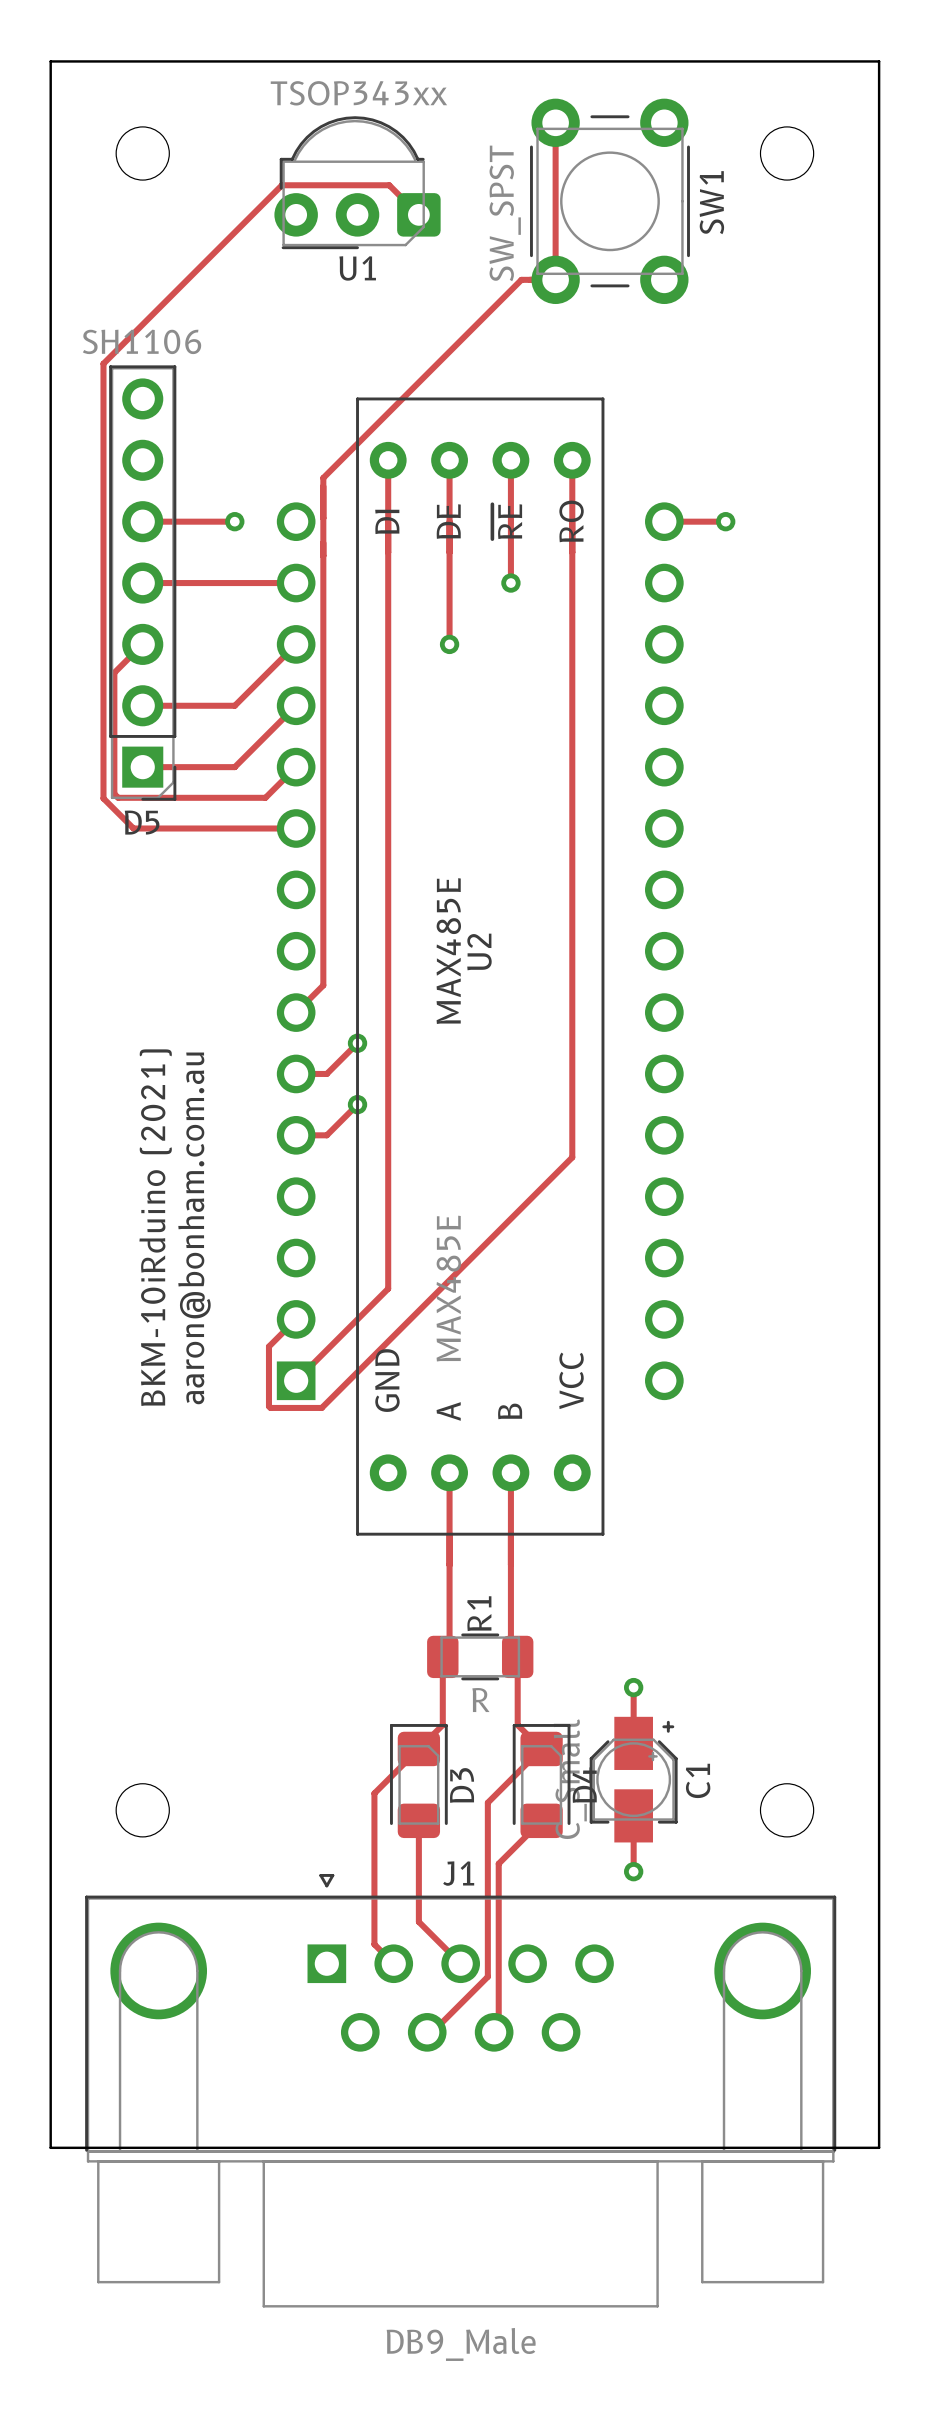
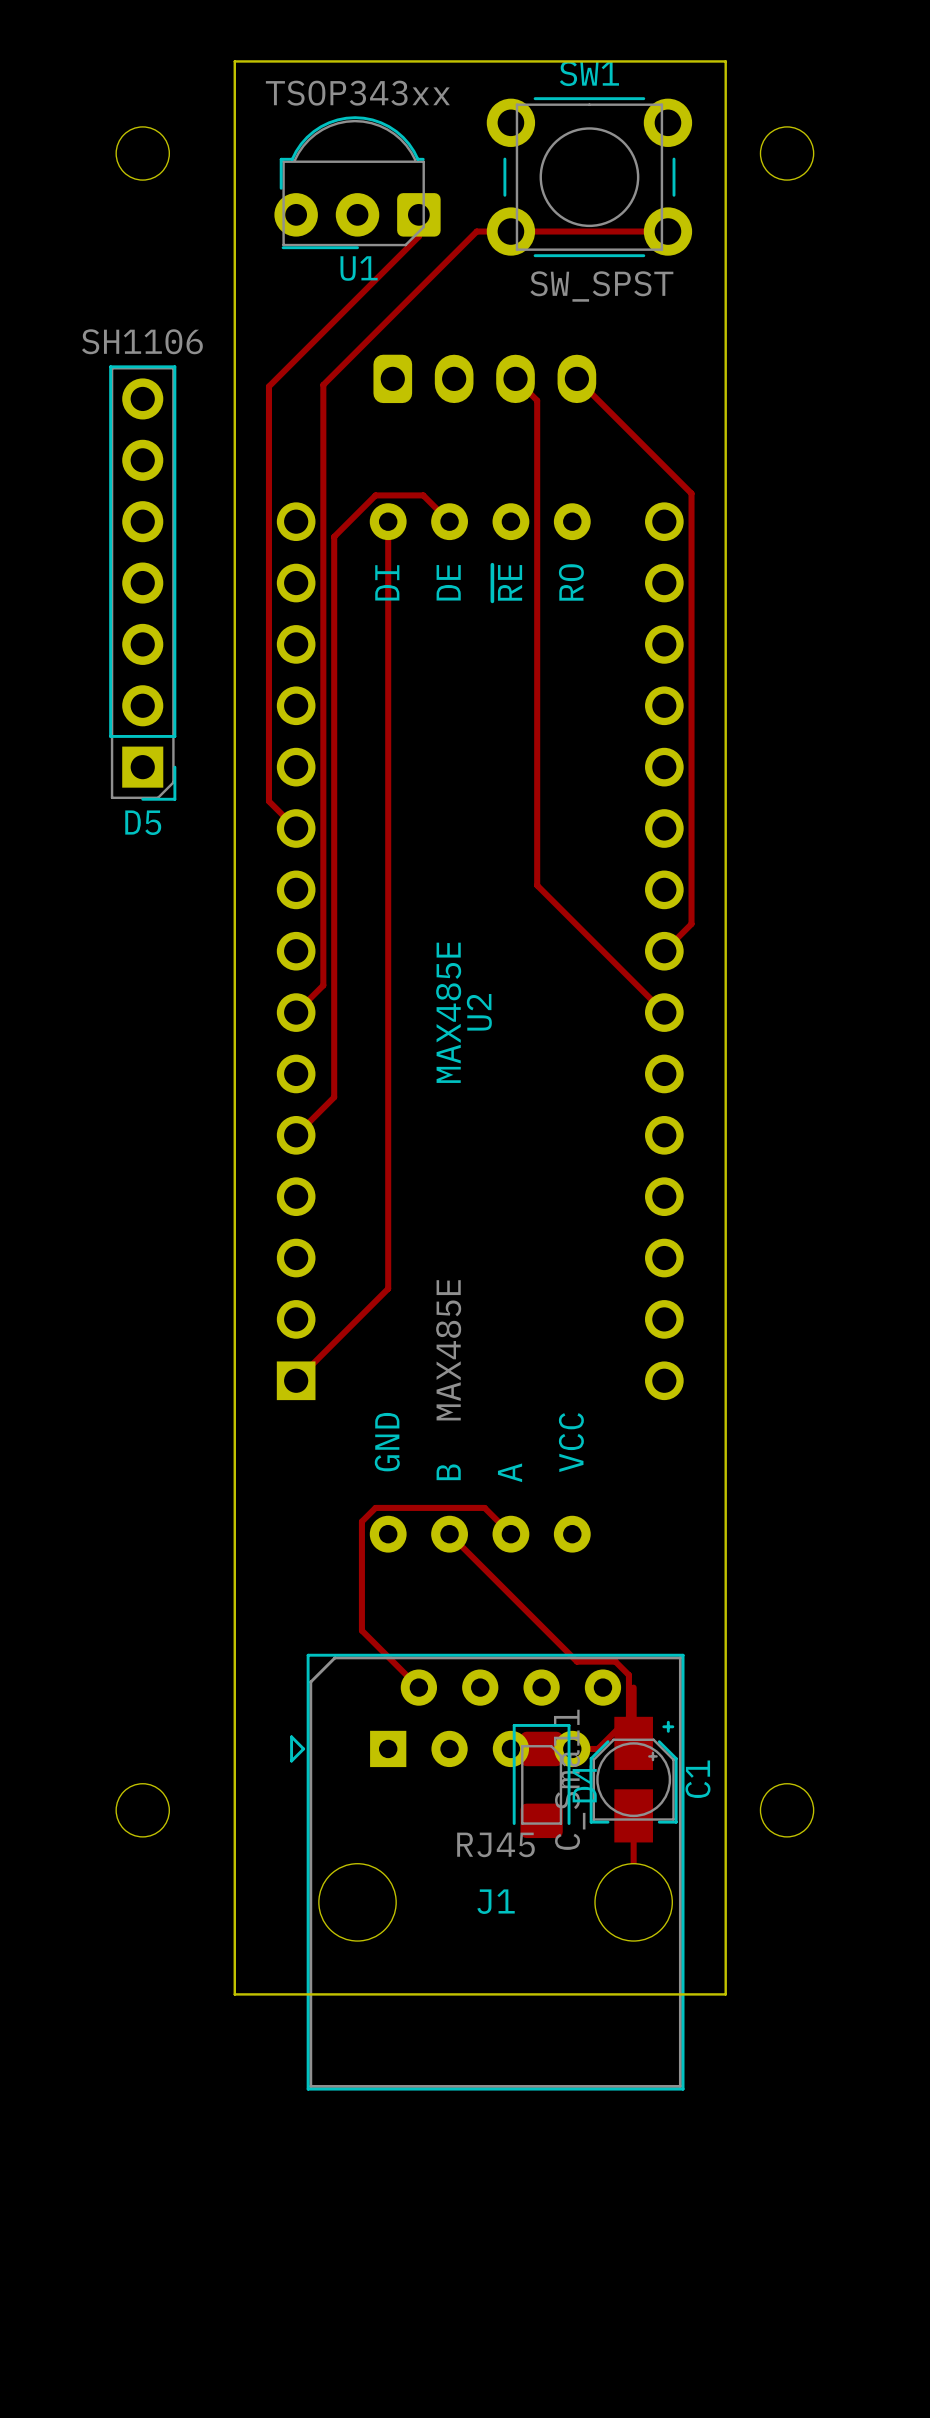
board edge: (234, 61) (50, 61) (50, 2147) (879, 2147) (879, 61) (725, 61) -> (234, 61) (234, 1994) (725, 1994) (725, 61)
track: (555, 122) (555, 279) (521, 279) (323, 477) -> (667, 231) (476, 231) (323, 384) (323, 477)
SW1 rotation: 0° (609, 201) -> 90° counterclockwise (589, 177)
track: (418, 214) (389, 185) (281, 185) (103, 363) (103, 798) (133, 828) (296, 828) -> (418, 214) (418, 236) (268, 386) (268, 801) (296, 828)
part: none -> (484, 378)
track: none -> (515, 378) (537, 400) (537, 885) (664, 1012)
track: none -> (576, 378) (691, 493) (691, 924) (664, 951)
line: (357, 398) (357, 1534) (602, 1534) (602, 398) (357, 398) -> none
track: (388, 460) (388, 521) -> none
track: (449, 460) (449, 644) -> none
track: (510, 460) (510, 583) -> none
track: (572, 460) (572, 1157) (321, 1407) (270, 1407) (268, 1406) (268, 1346) (296, 1319) -> none
track: (142, 521) (234, 521) -> none
via: (234, 521) -> none
track: (664, 521) (725, 521) -> none
via: (725, 521) -> none
track: (142, 583) (296, 583) -> none
via: (510, 583) -> none
track: (142, 644) (114, 672) (114, 793) (118, 797) (265, 797) (296, 767) -> none
track: (296, 644) (234, 705) (142, 705) -> none
via: (449, 644) -> none
track: (296, 705) (234, 767) (142, 767) -> none
U2 position: (480, 966) -> (480, 1027)
track: (357, 1043) (326, 1073) (296, 1073) -> none
via: (357, 1043) -> none
track: (357, 1104) (326, 1135) (296, 1135) -> (449, 521) (423, 495) (375, 495) (334, 536) (334, 1097) (296, 1135)
via: (357, 1104) -> none
text: BKM-10iRduino (2021) (155, 1227) -> none
text: aaron@bonham.com.au (194, 1228) -> none
U2 text: A (448, 1411) -> B (448, 1472)
U2 text: B (510, 1411) -> A (510, 1472)
track: (449, 1472) (449, 1650) (442, 1656) (442, 1725) (374, 1793) (374, 1944) (393, 1963) -> none
track: (510, 1472) (510, 1650) (517, 1656) (517, 1725) (541, 1748) (487, 1802) (487, 1976) (432, 2032) (427, 2032) -> none
track: none -> (449, 1534) (577, 1661) (615, 1661) (628, 1675) (628, 1717) (597, 1748) (572, 1748)
track: none -> (510, 1534) (484, 1507) (375, 1507) (361, 1521) (361, 1630) (418, 1687)
R1: R (480, 1656) -> none
via: (633, 1687) -> none
D3: (418, 1781) -> none
track: (418, 1820) (418, 1921) (460, 1963) -> none
track: (541, 1820) (498, 1863) (498, 2027) (494, 2032) -> none
via: (633, 1871) -> none
J1 name position: J1 (458, 1873) -> J1 (496, 1901)
J1 footprint: [85, 1874, 837, 2308] -> [290, 1653, 685, 2091]
J1 value: DB9_Male (461, 2344) -> RJ45 (495, 1844)

